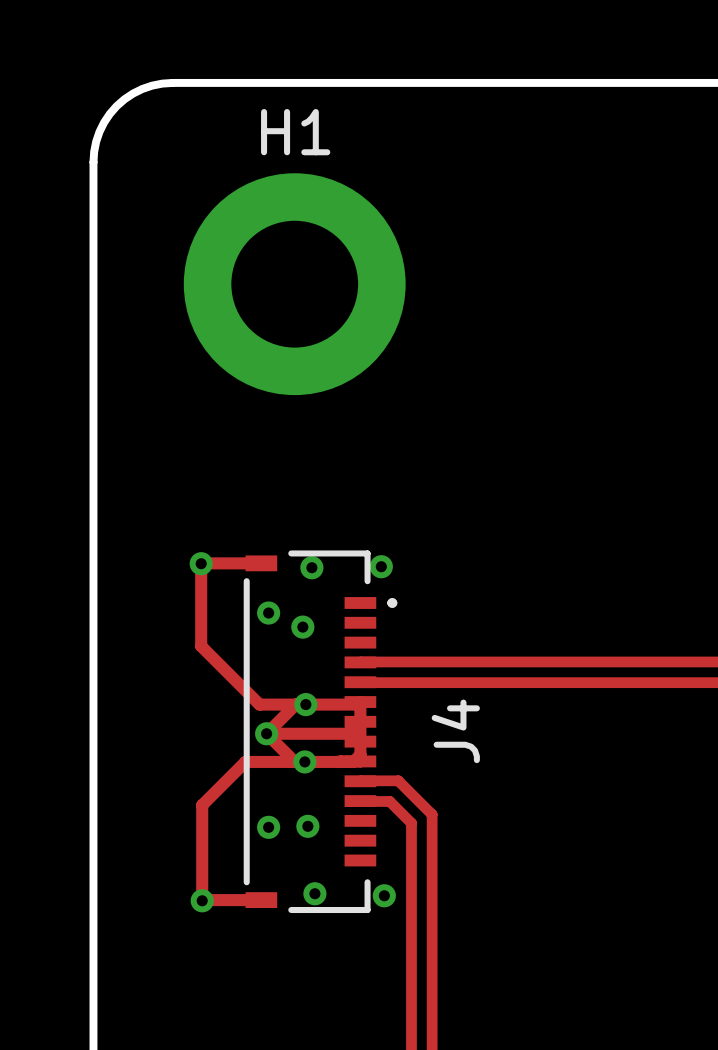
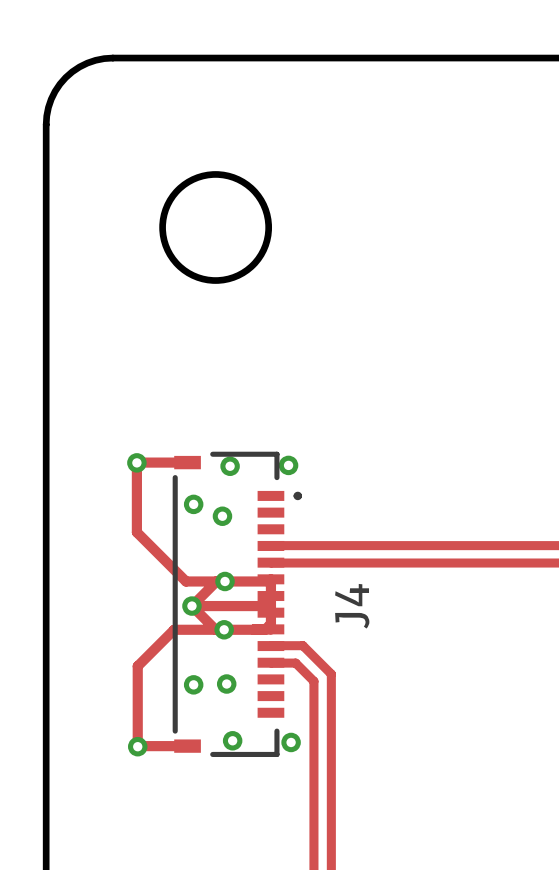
round board edge: none -> [159, 171, 273, 284]
H1: (294, 284) -> none

